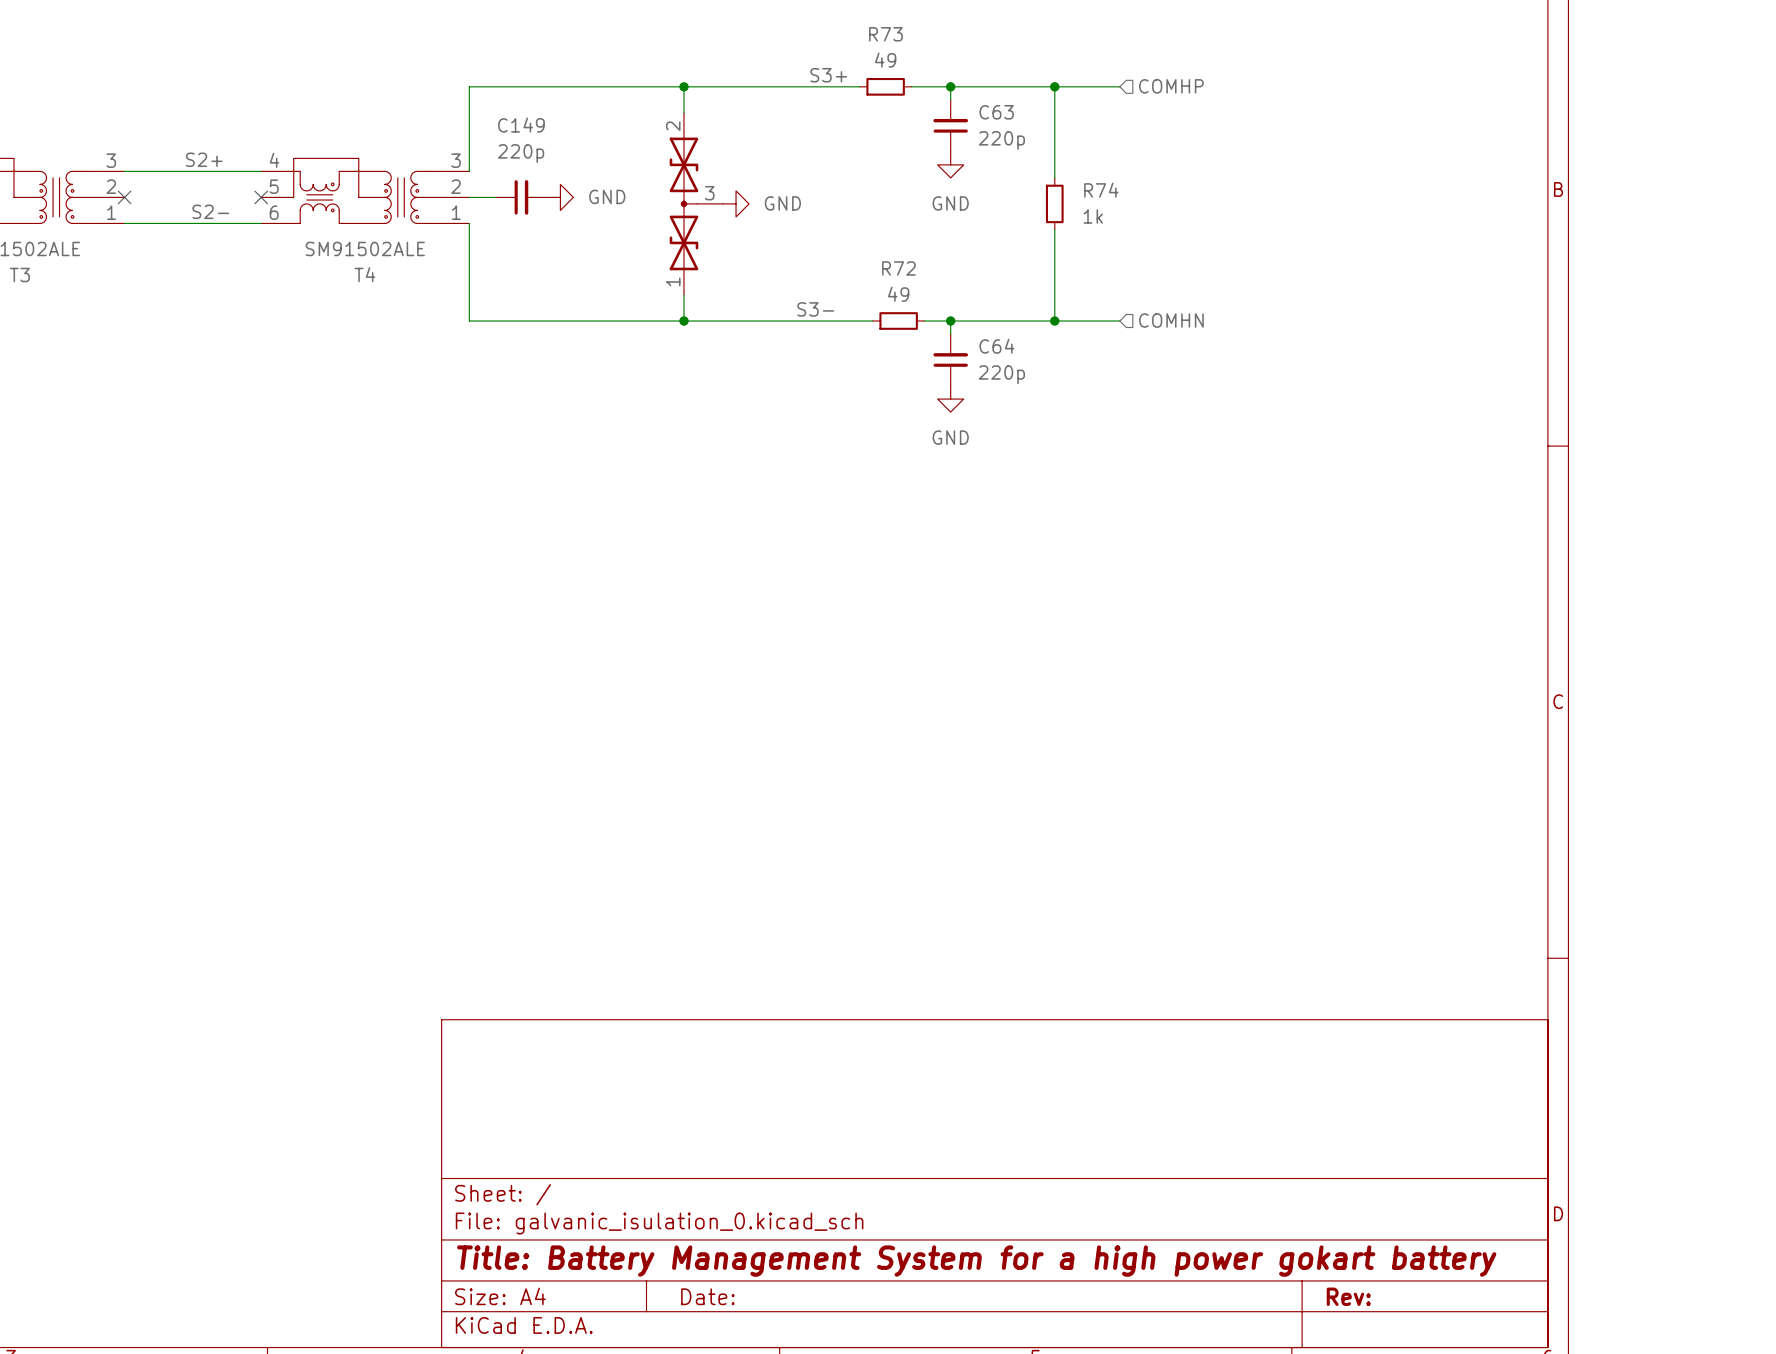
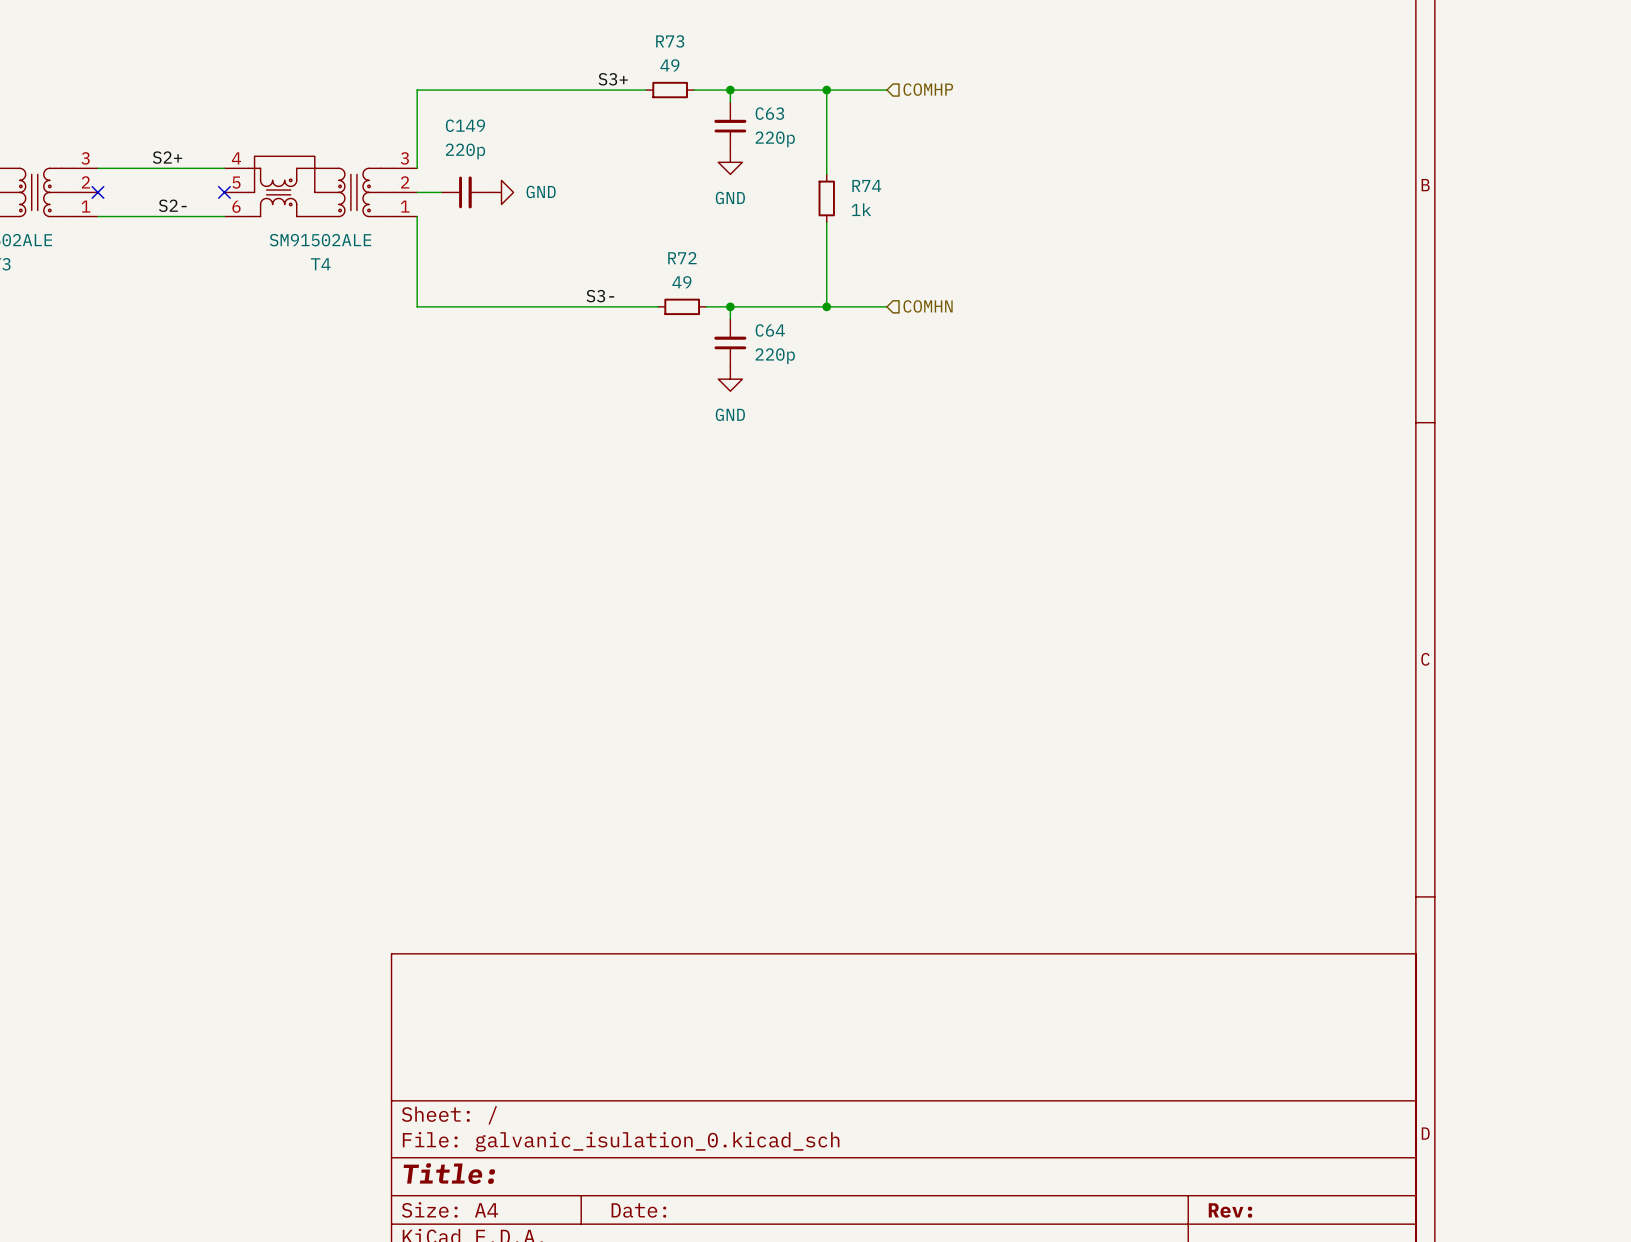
label position: S3+ (828, 75) -> S3+ (613, 79)
wire: (683, 86) (683, 112) -> none
junction: (683, 86) -> none
wire: (716, 86) (768, 86) -> none
junction: none -> (730, 90)
wire: none -> (778, 90) (826, 90) (826, 174)
R73 position: (885, 86) -> (670, 90)
wire: (950, 86) (950, 99) -> (730, 90) (730, 102)
junction position: (950, 86) -> (826, 90)
wire: (976, 86) (1119, 86) -> none
wire: (1054, 86) (1054, 177) -> none
junction: (1054, 86) -> none
hierarchical label position: COMHP (1171, 86) -> COMHP (928, 89)
C63 position: (950, 125) -> (730, 126)
power symbol: none -> GND (730, 162)
power symbol: GND (950, 164) -> none
part: (696, 203) -> none
power symbol: GND (736, 203) -> none
R74 position: (1054, 203) -> (826, 198)
wire: (1054, 229) (1054, 321) -> (826, 222) (826, 306)
wire: (683, 294) (683, 321) -> none
label position: S3- (815, 309) -> S3- (600, 296)
hierarchical label position: COMHN (1171, 320) -> COMHN (928, 306)
junction: (683, 321) -> none
wire: (729, 321) (781, 321) -> (790, 306) (838, 306)
junction: none -> (730, 306)
R72 position: (898, 321) -> (682, 306)
wire: (950, 321) (950, 334) -> (730, 306) (730, 318)
junction position: (950, 321) -> (826, 306)
wire: (976, 321) (1119, 321) -> none
junction: (1054, 321) -> none
C64 position: (950, 360) -> (730, 343)
power symbol: none -> GND (730, 379)
power symbol: GND (950, 399) -> none
title block: Title: Battery Management System for a high power gokart battery (976, 1261) -> Title: (449, 1173)

